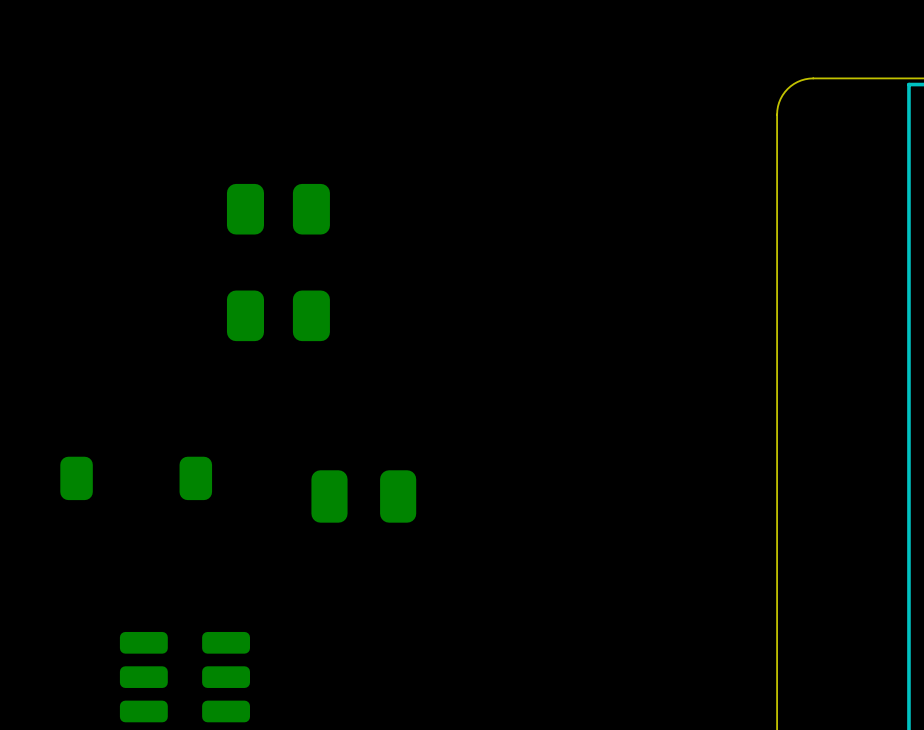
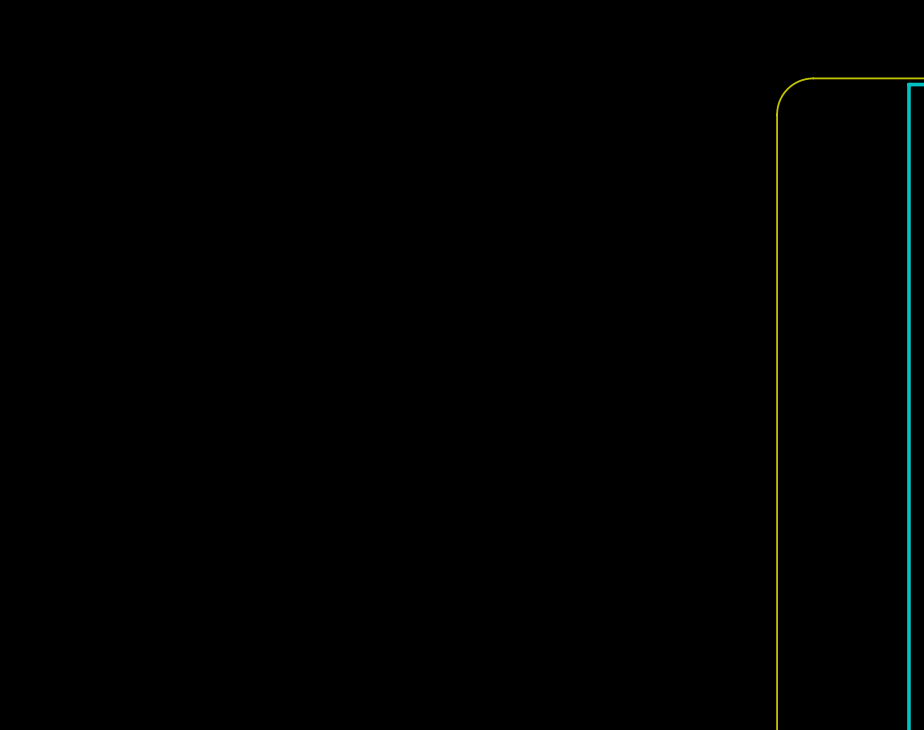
part: (278, 209) -> none
part: (278, 315) -> none
part: (136, 478) -> none
part: (363, 496) -> none
part: (184, 677) -> none

